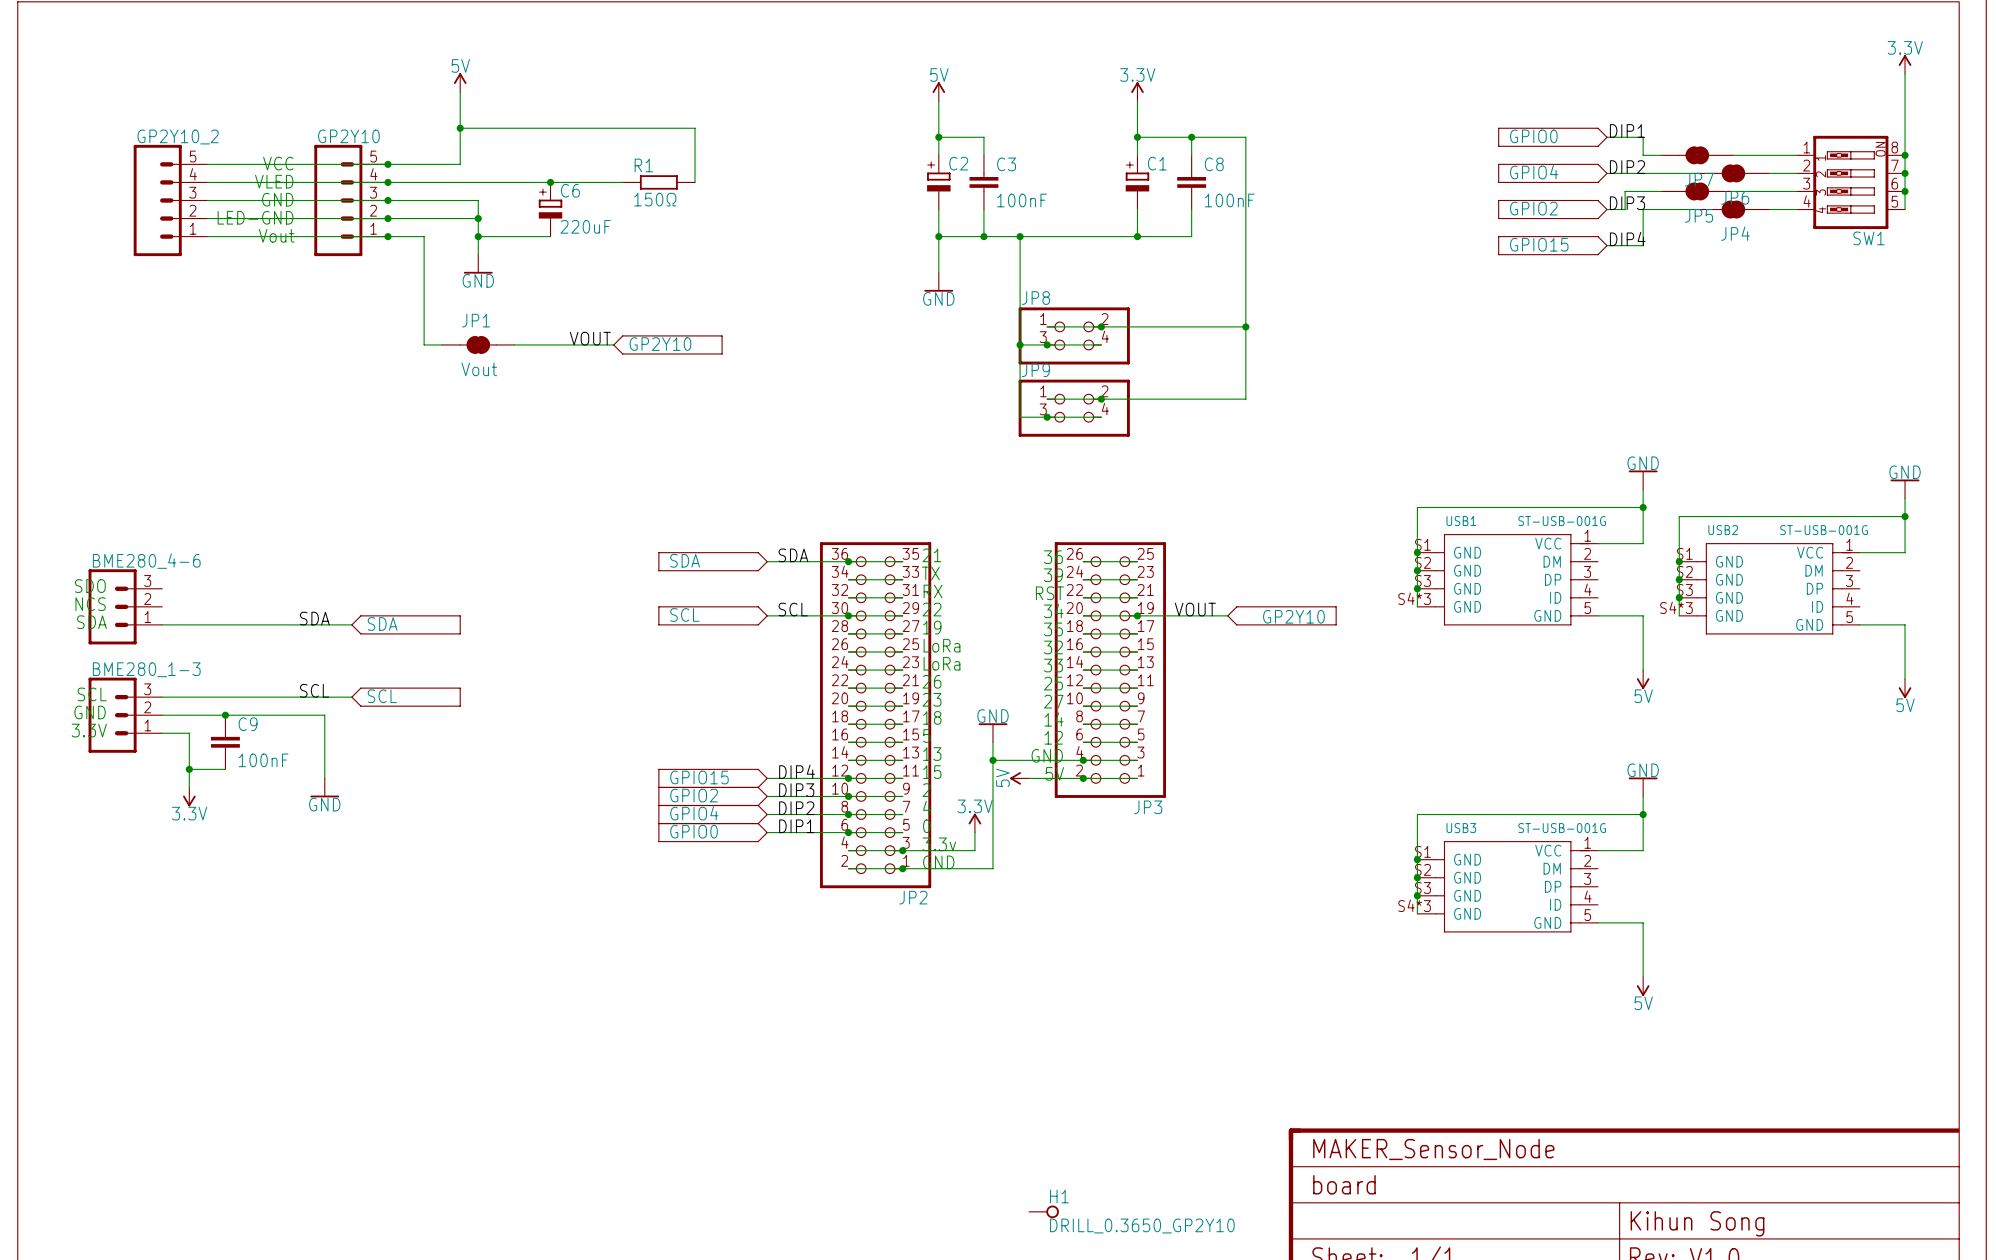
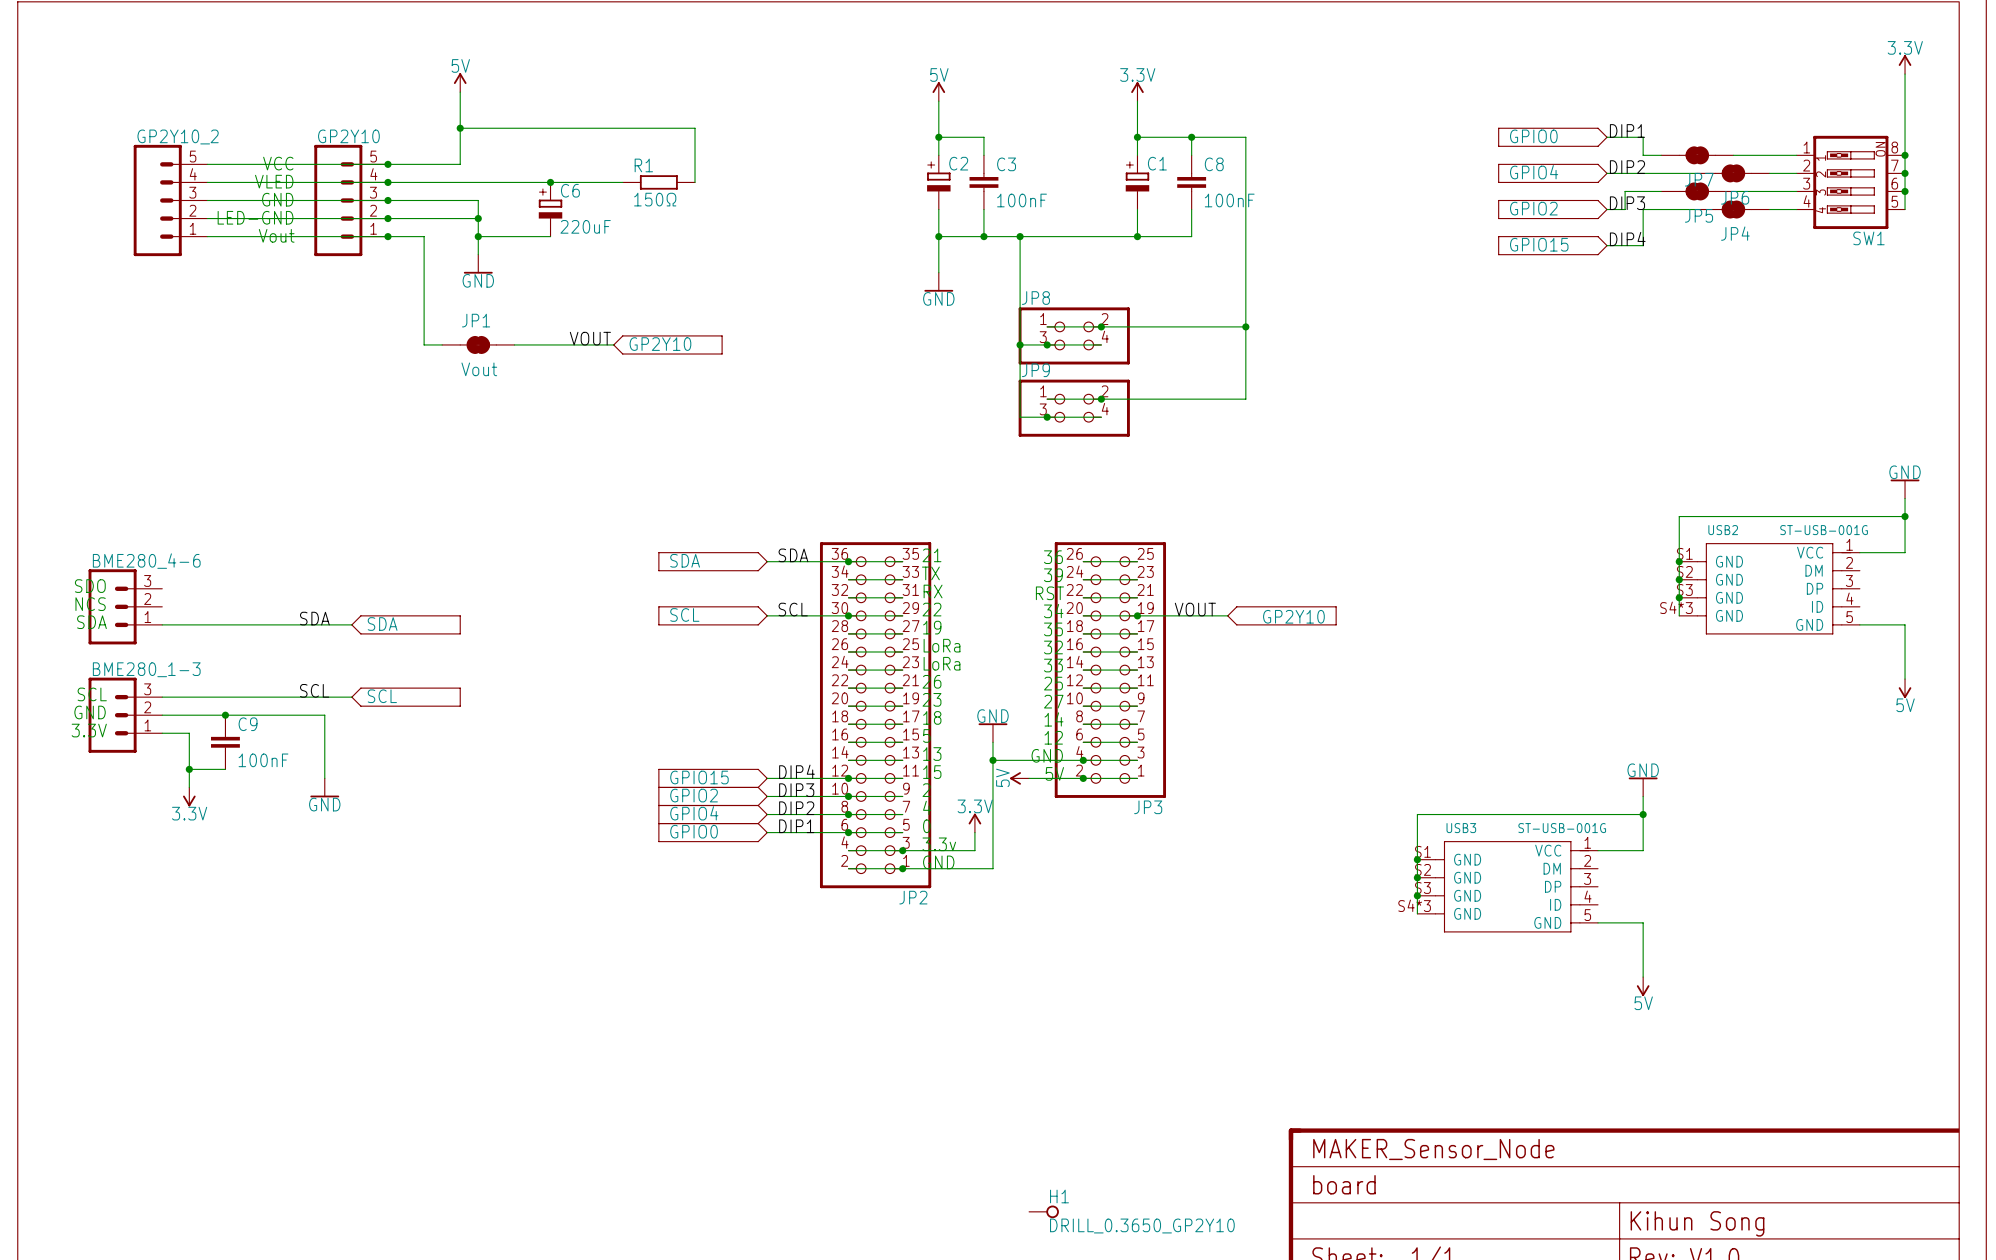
power symbol: GND (1643, 479) -> none
wire: (1643, 489) (1643, 543) (1598, 543) -> none
wire: (1643, 507) (1417, 507) (1417, 606) -> none
junction: (1643, 507) -> none
junction: (1417, 552) -> none
junction: (1417, 570) -> none
USB1: ST-USB-001G (1507, 579) -> none
junction: (1417, 588) -> none
wire: (1598, 615) (1643, 615) (1643, 670) -> none
power symbol: 5V (1643, 679) -> none

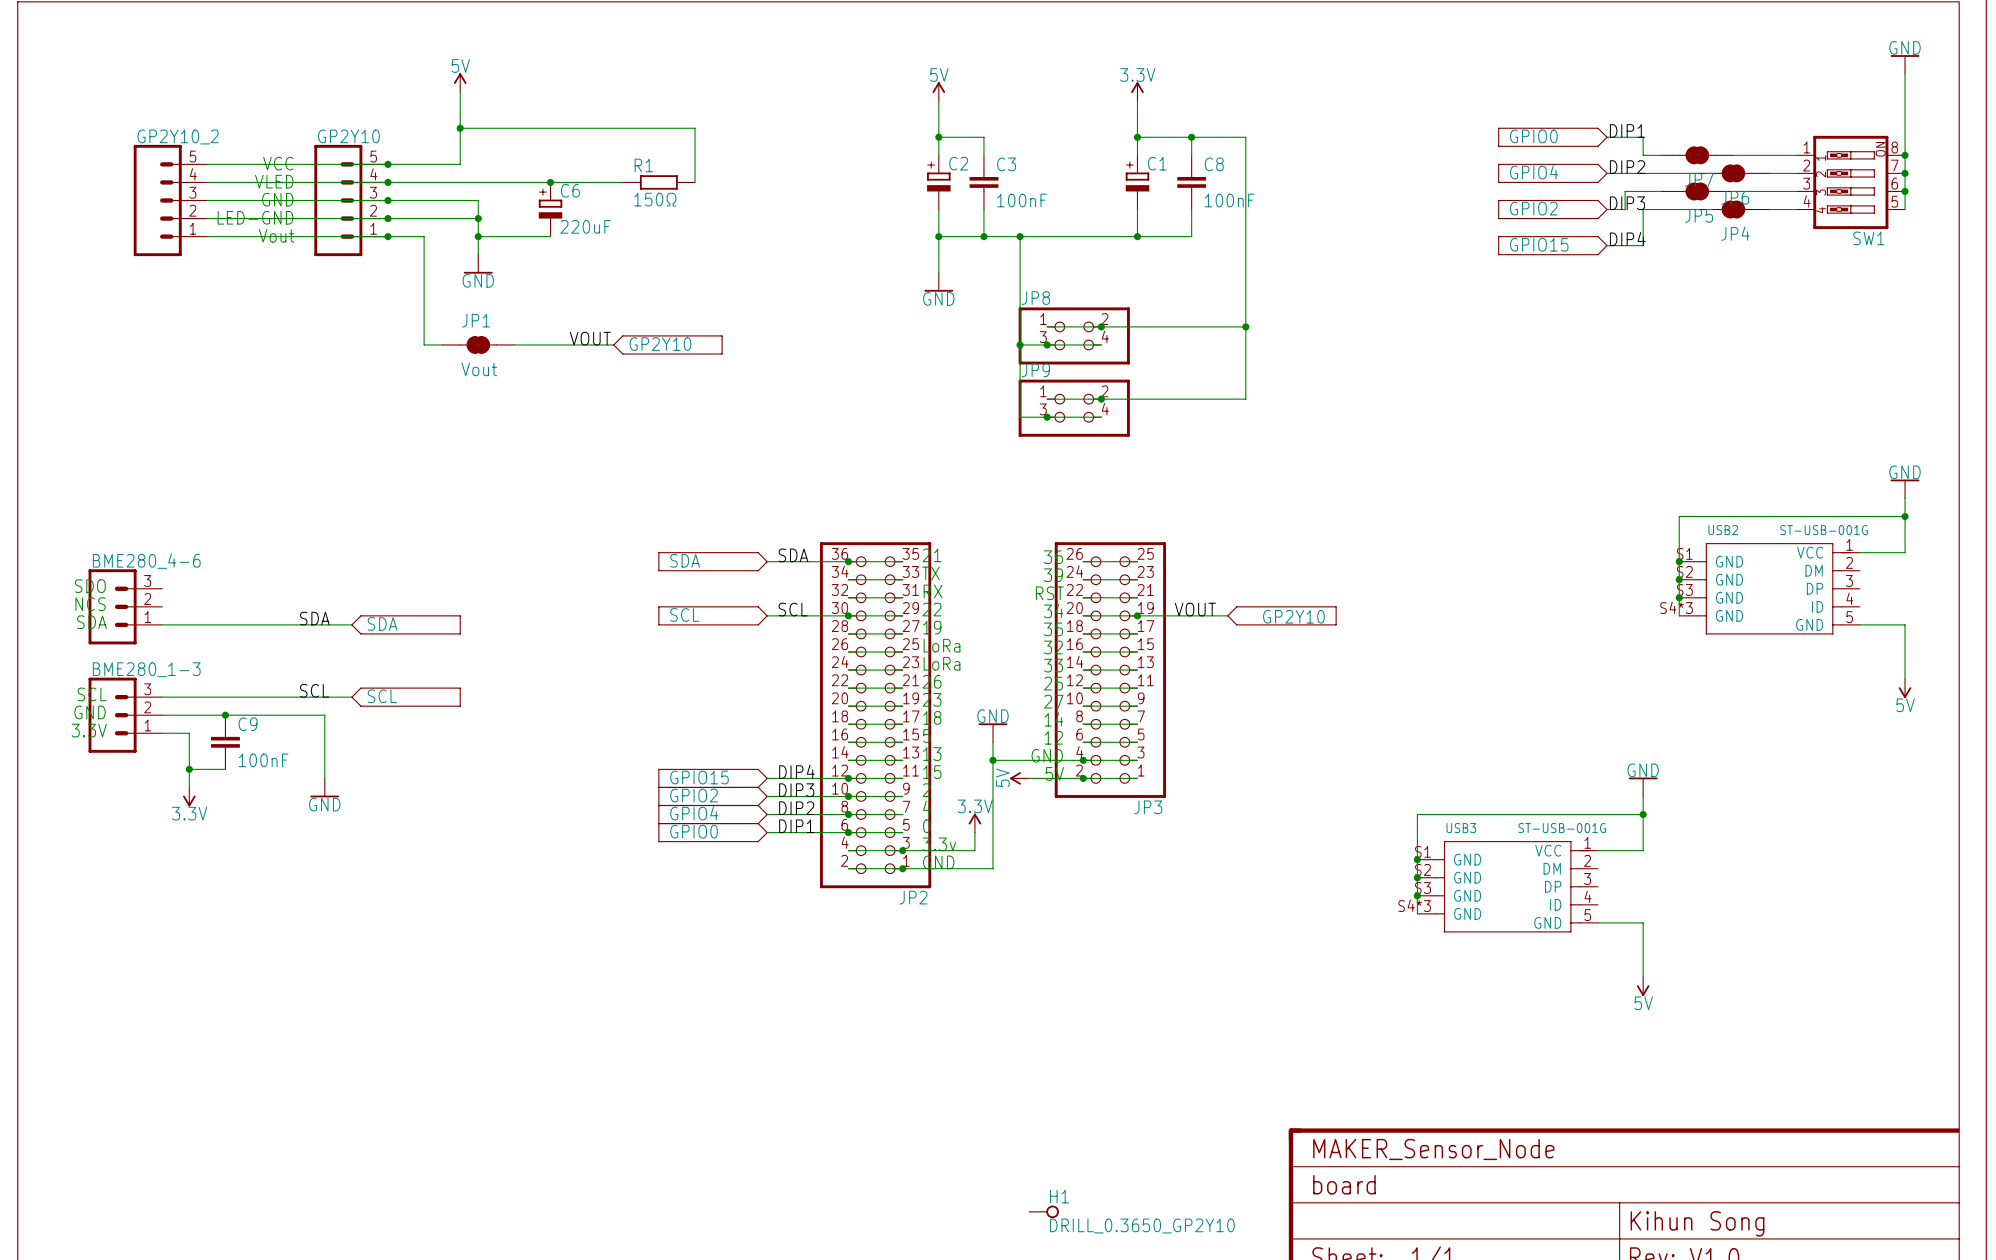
power symbol: 3.3V (1905, 64) -> GND (1905, 64)

